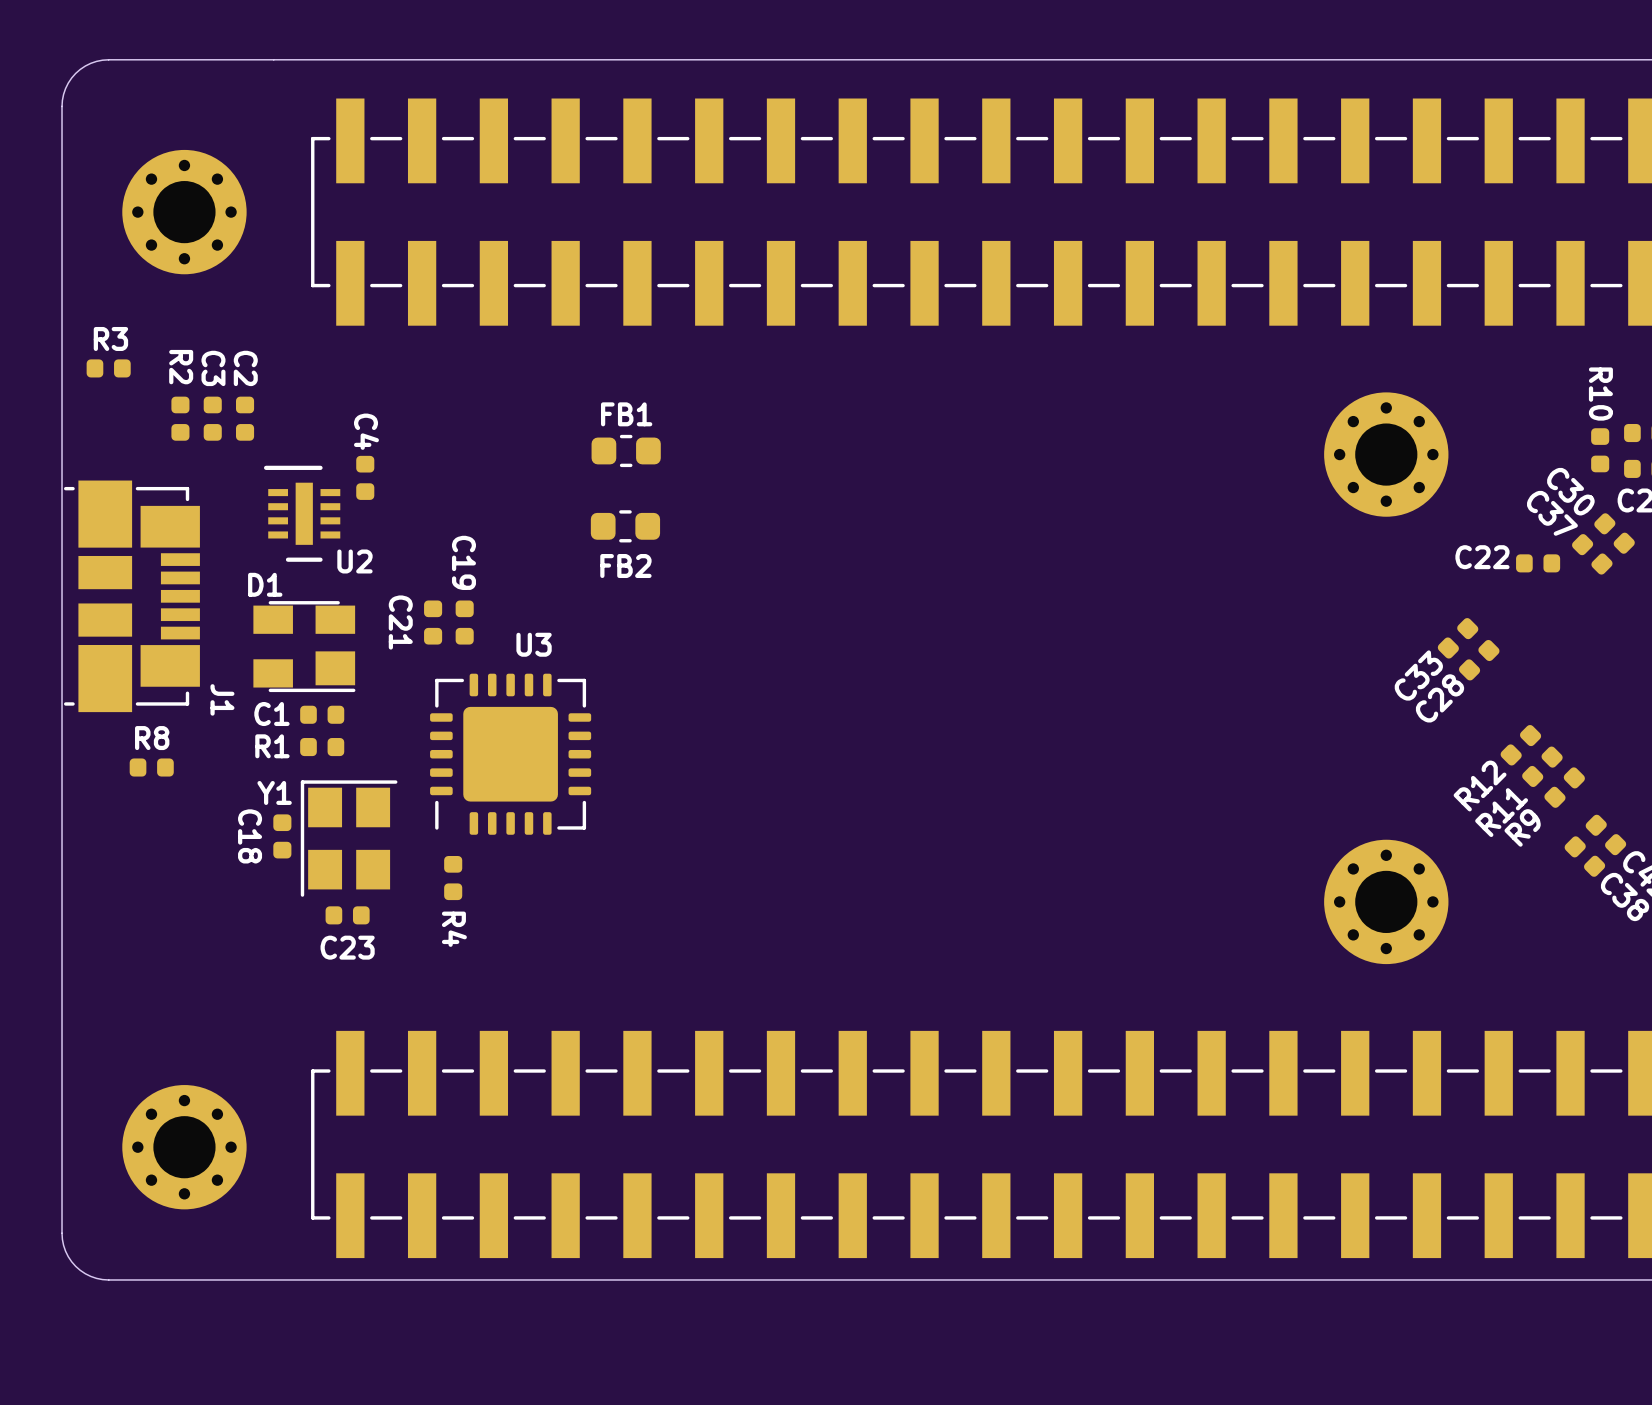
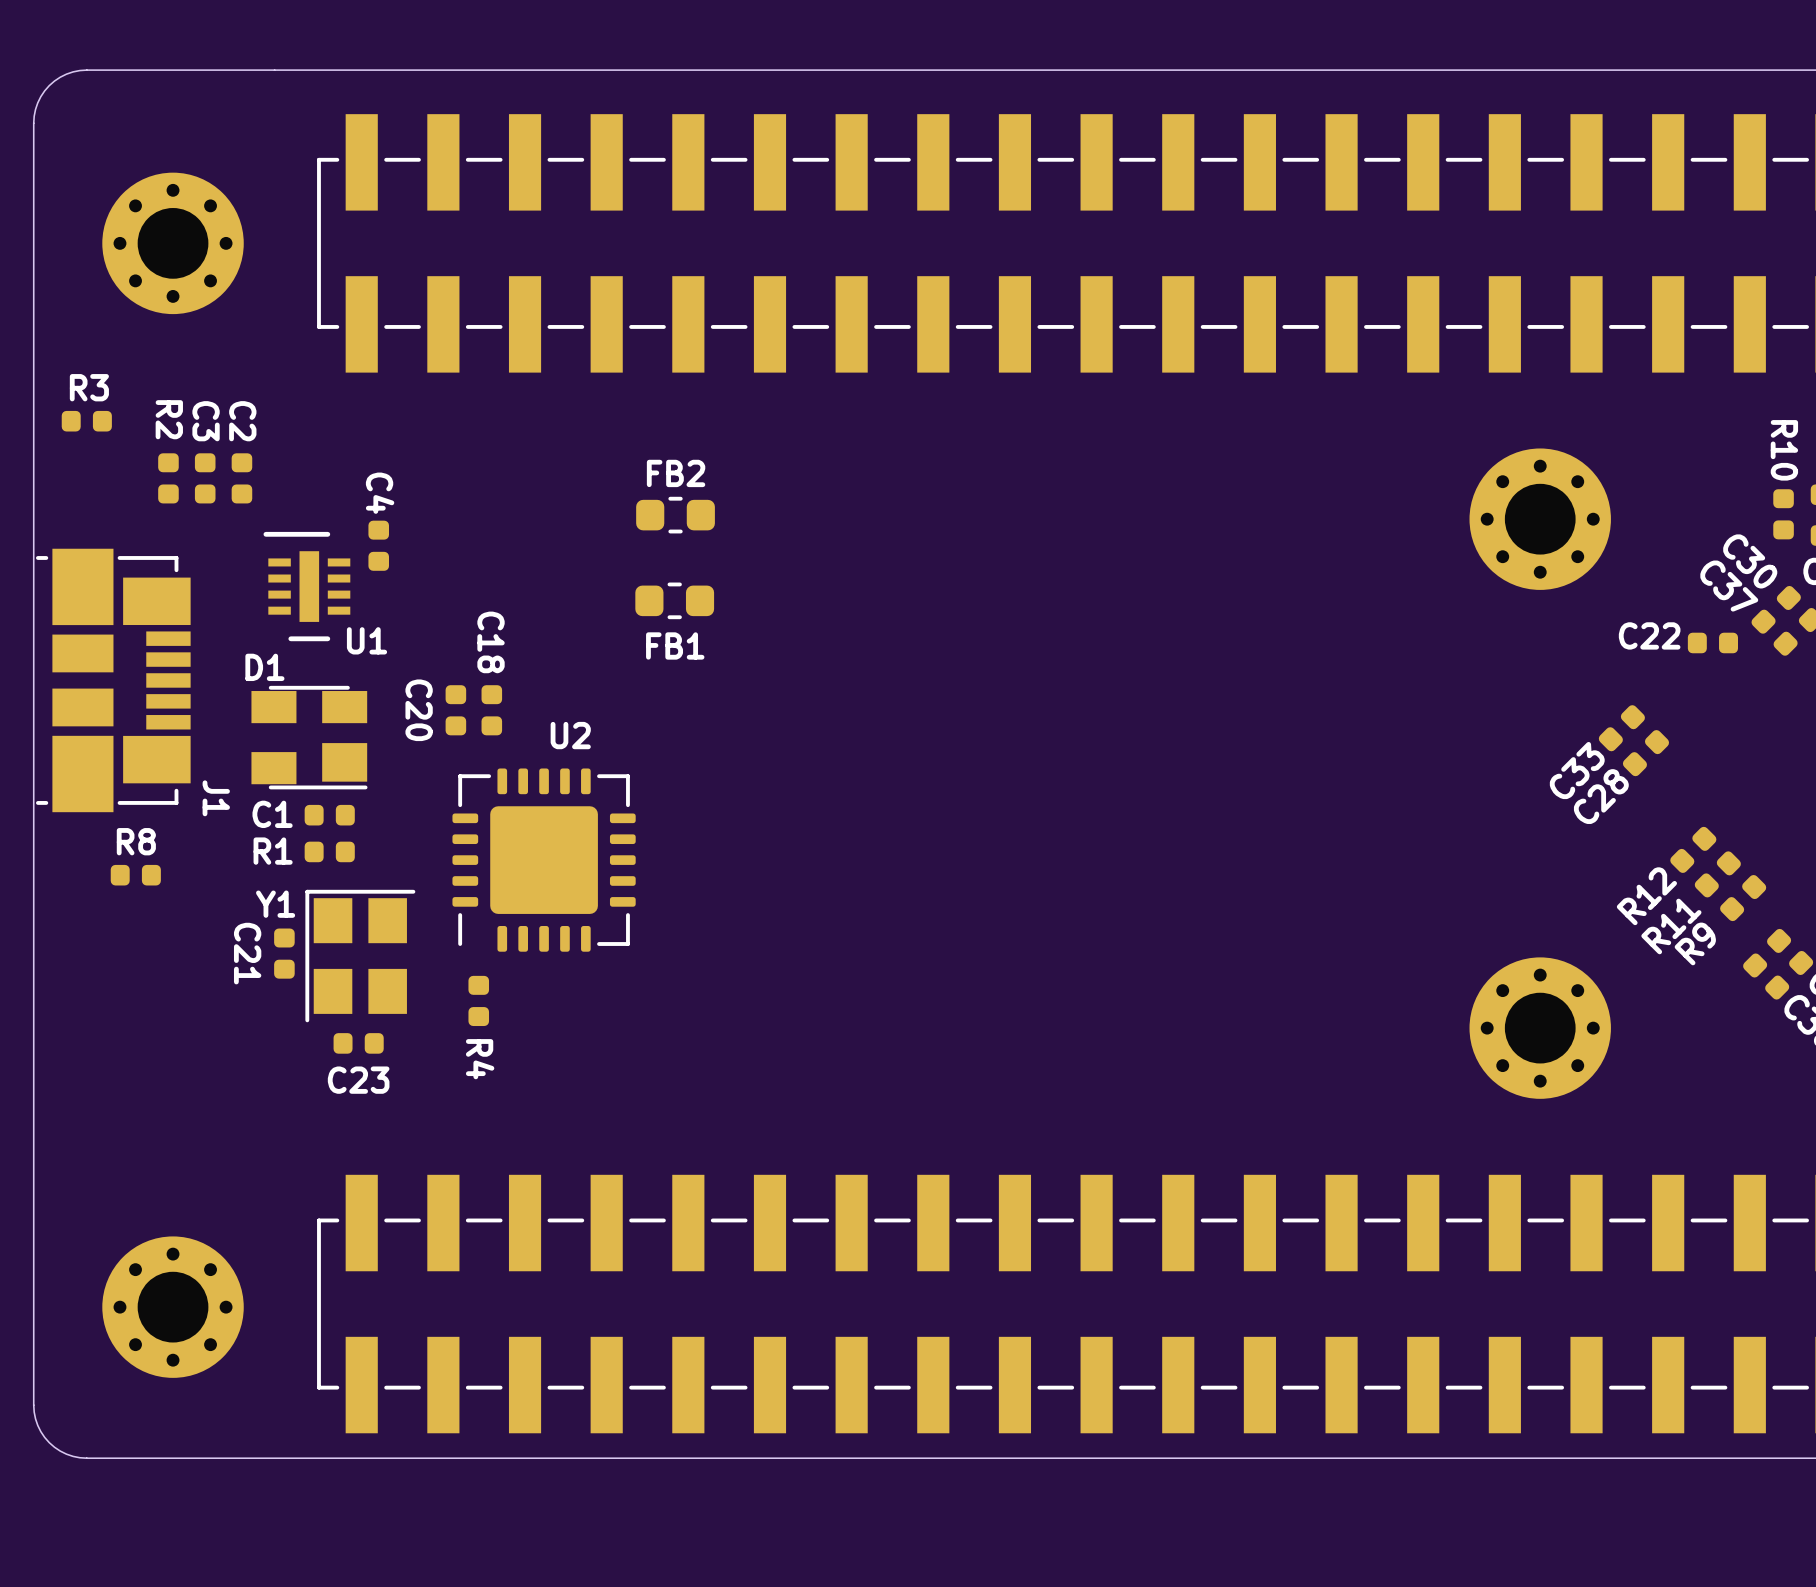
FB1 name: FB1 (626, 414) -> FB2 (676, 473)
U2 name: U2 (354, 561) -> U1 (367, 640)
C19 name: C19 (463, 562) -> C18 (491, 642)
FB2 name: FB2 (625, 566) -> FB1 (675, 645)
C21 name: C21 (400, 622) -> C20 (419, 710)
U3 name: U3 (534, 644) -> U2 (570, 735)
C18 name: C18 (250, 836) -> C21 (247, 953)

